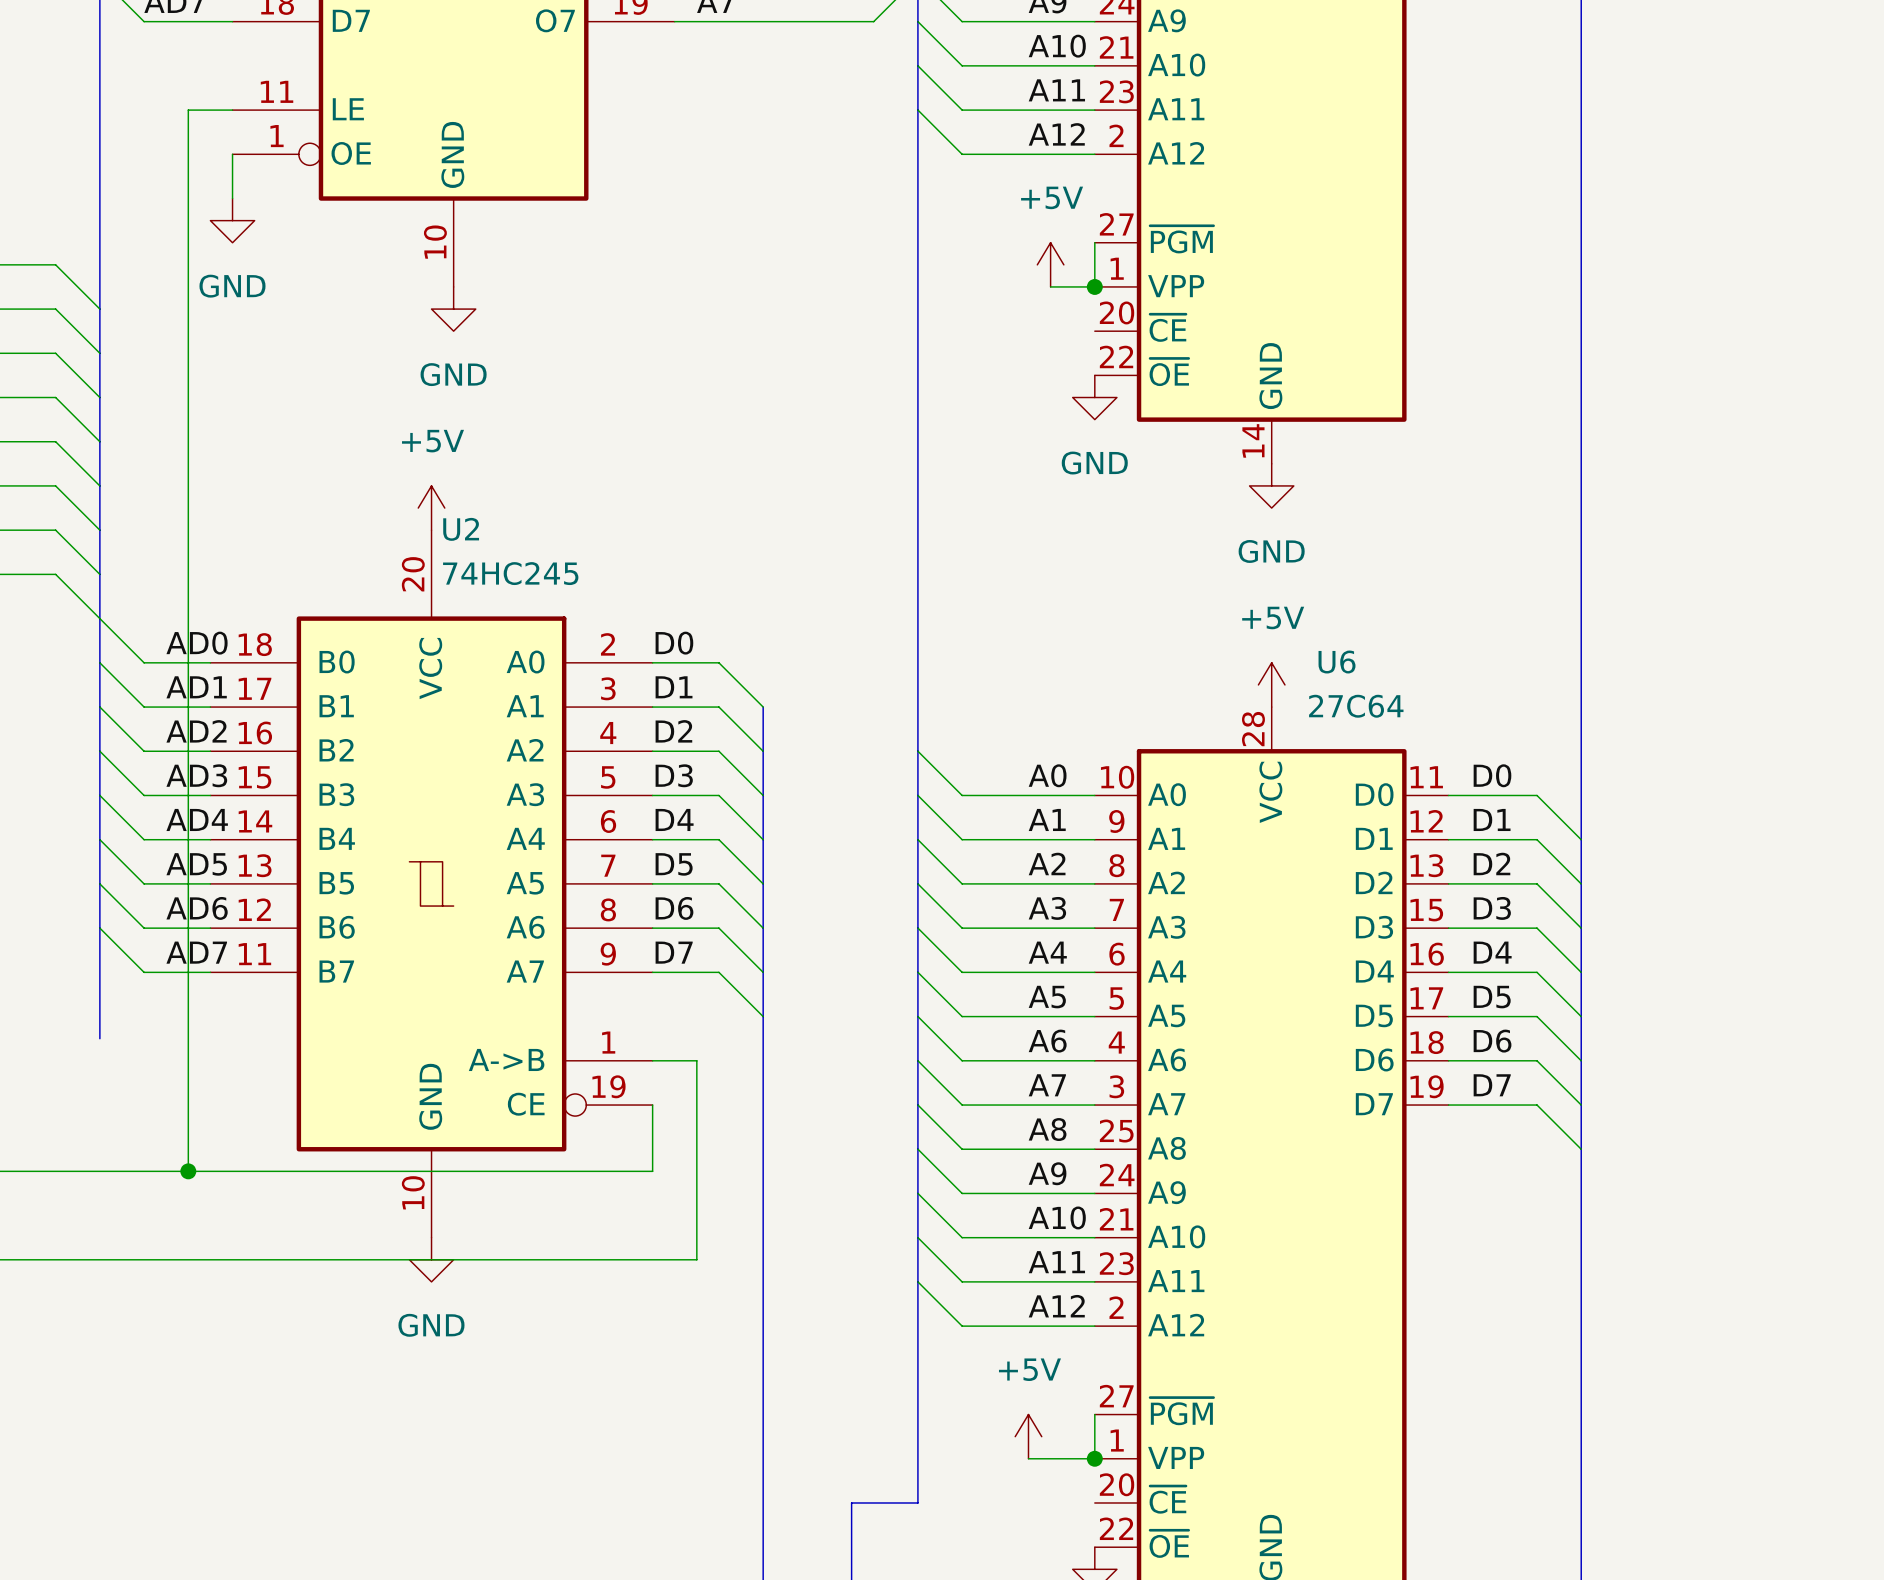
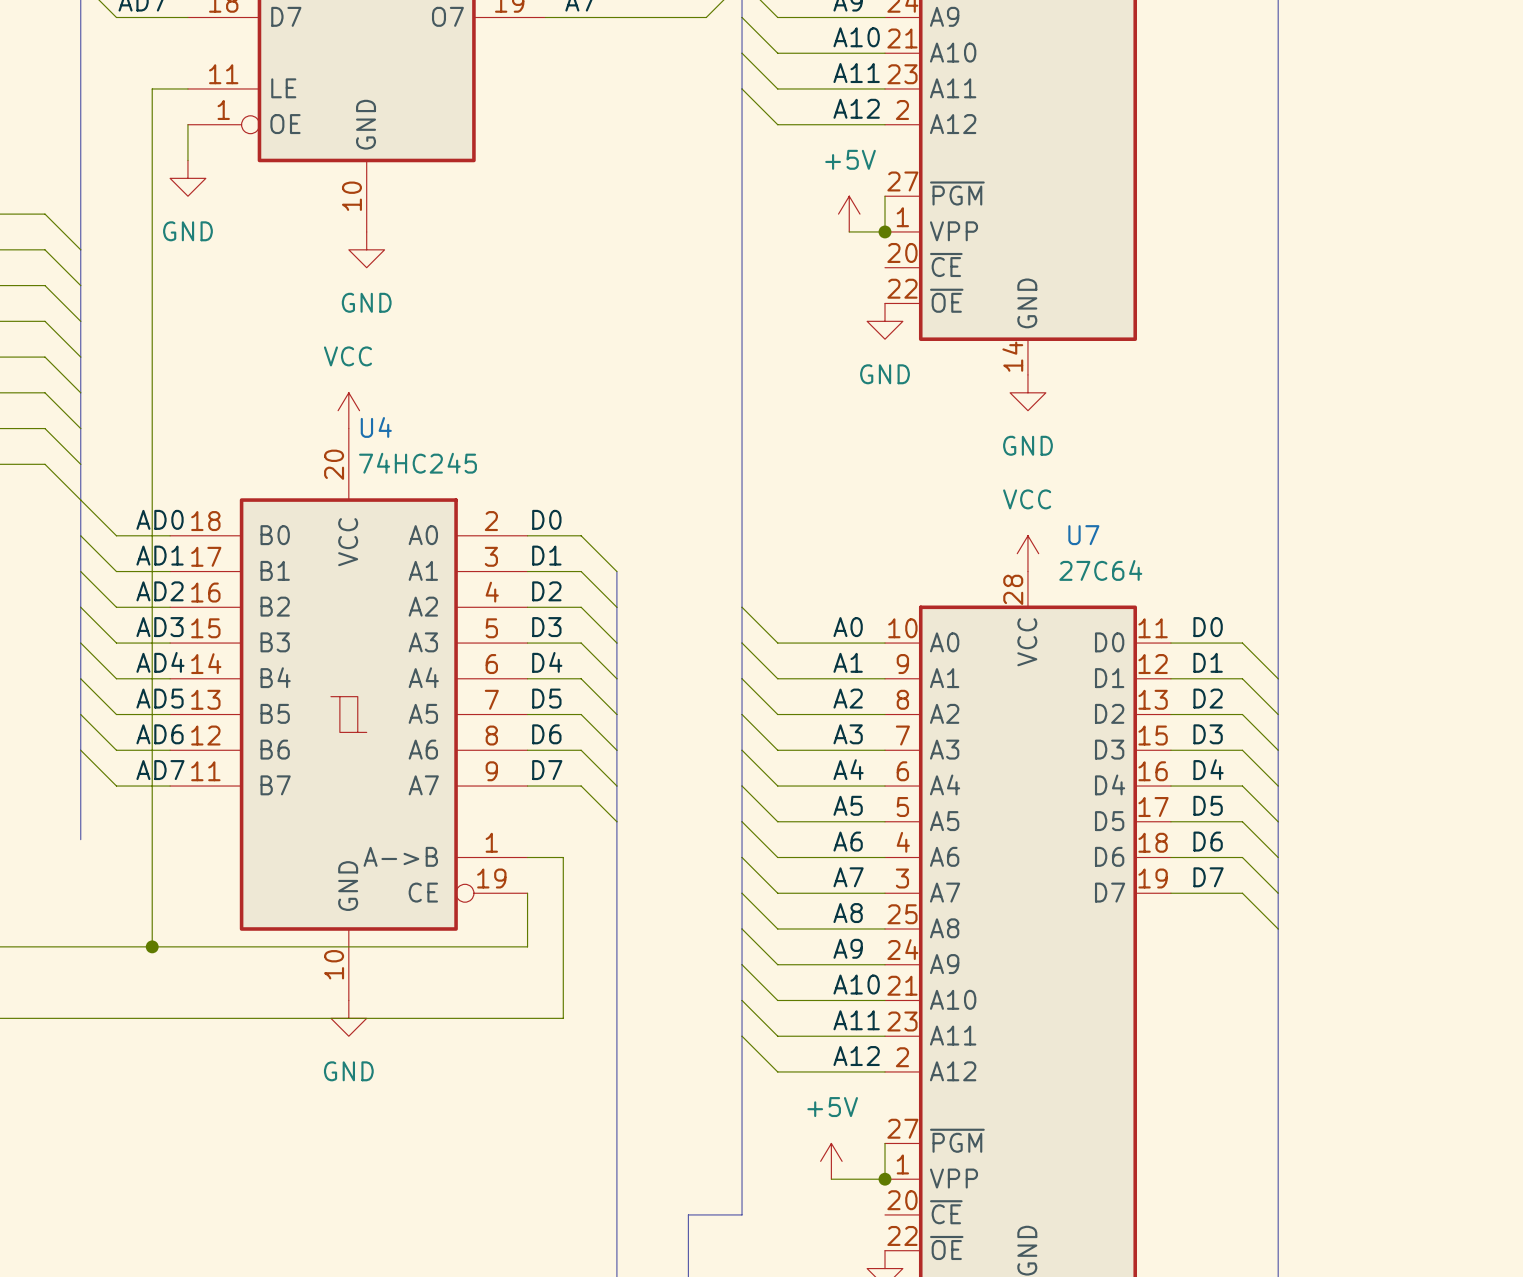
power symbol: +5V (431, 508) -> VCC (348, 410)
U2 name: U2 (461, 529) -> U4 (376, 427)
U6 name: U6 (1337, 662) -> U7 (1083, 535)
power symbol: +5V (1271, 684) -> VCC (1027, 553)

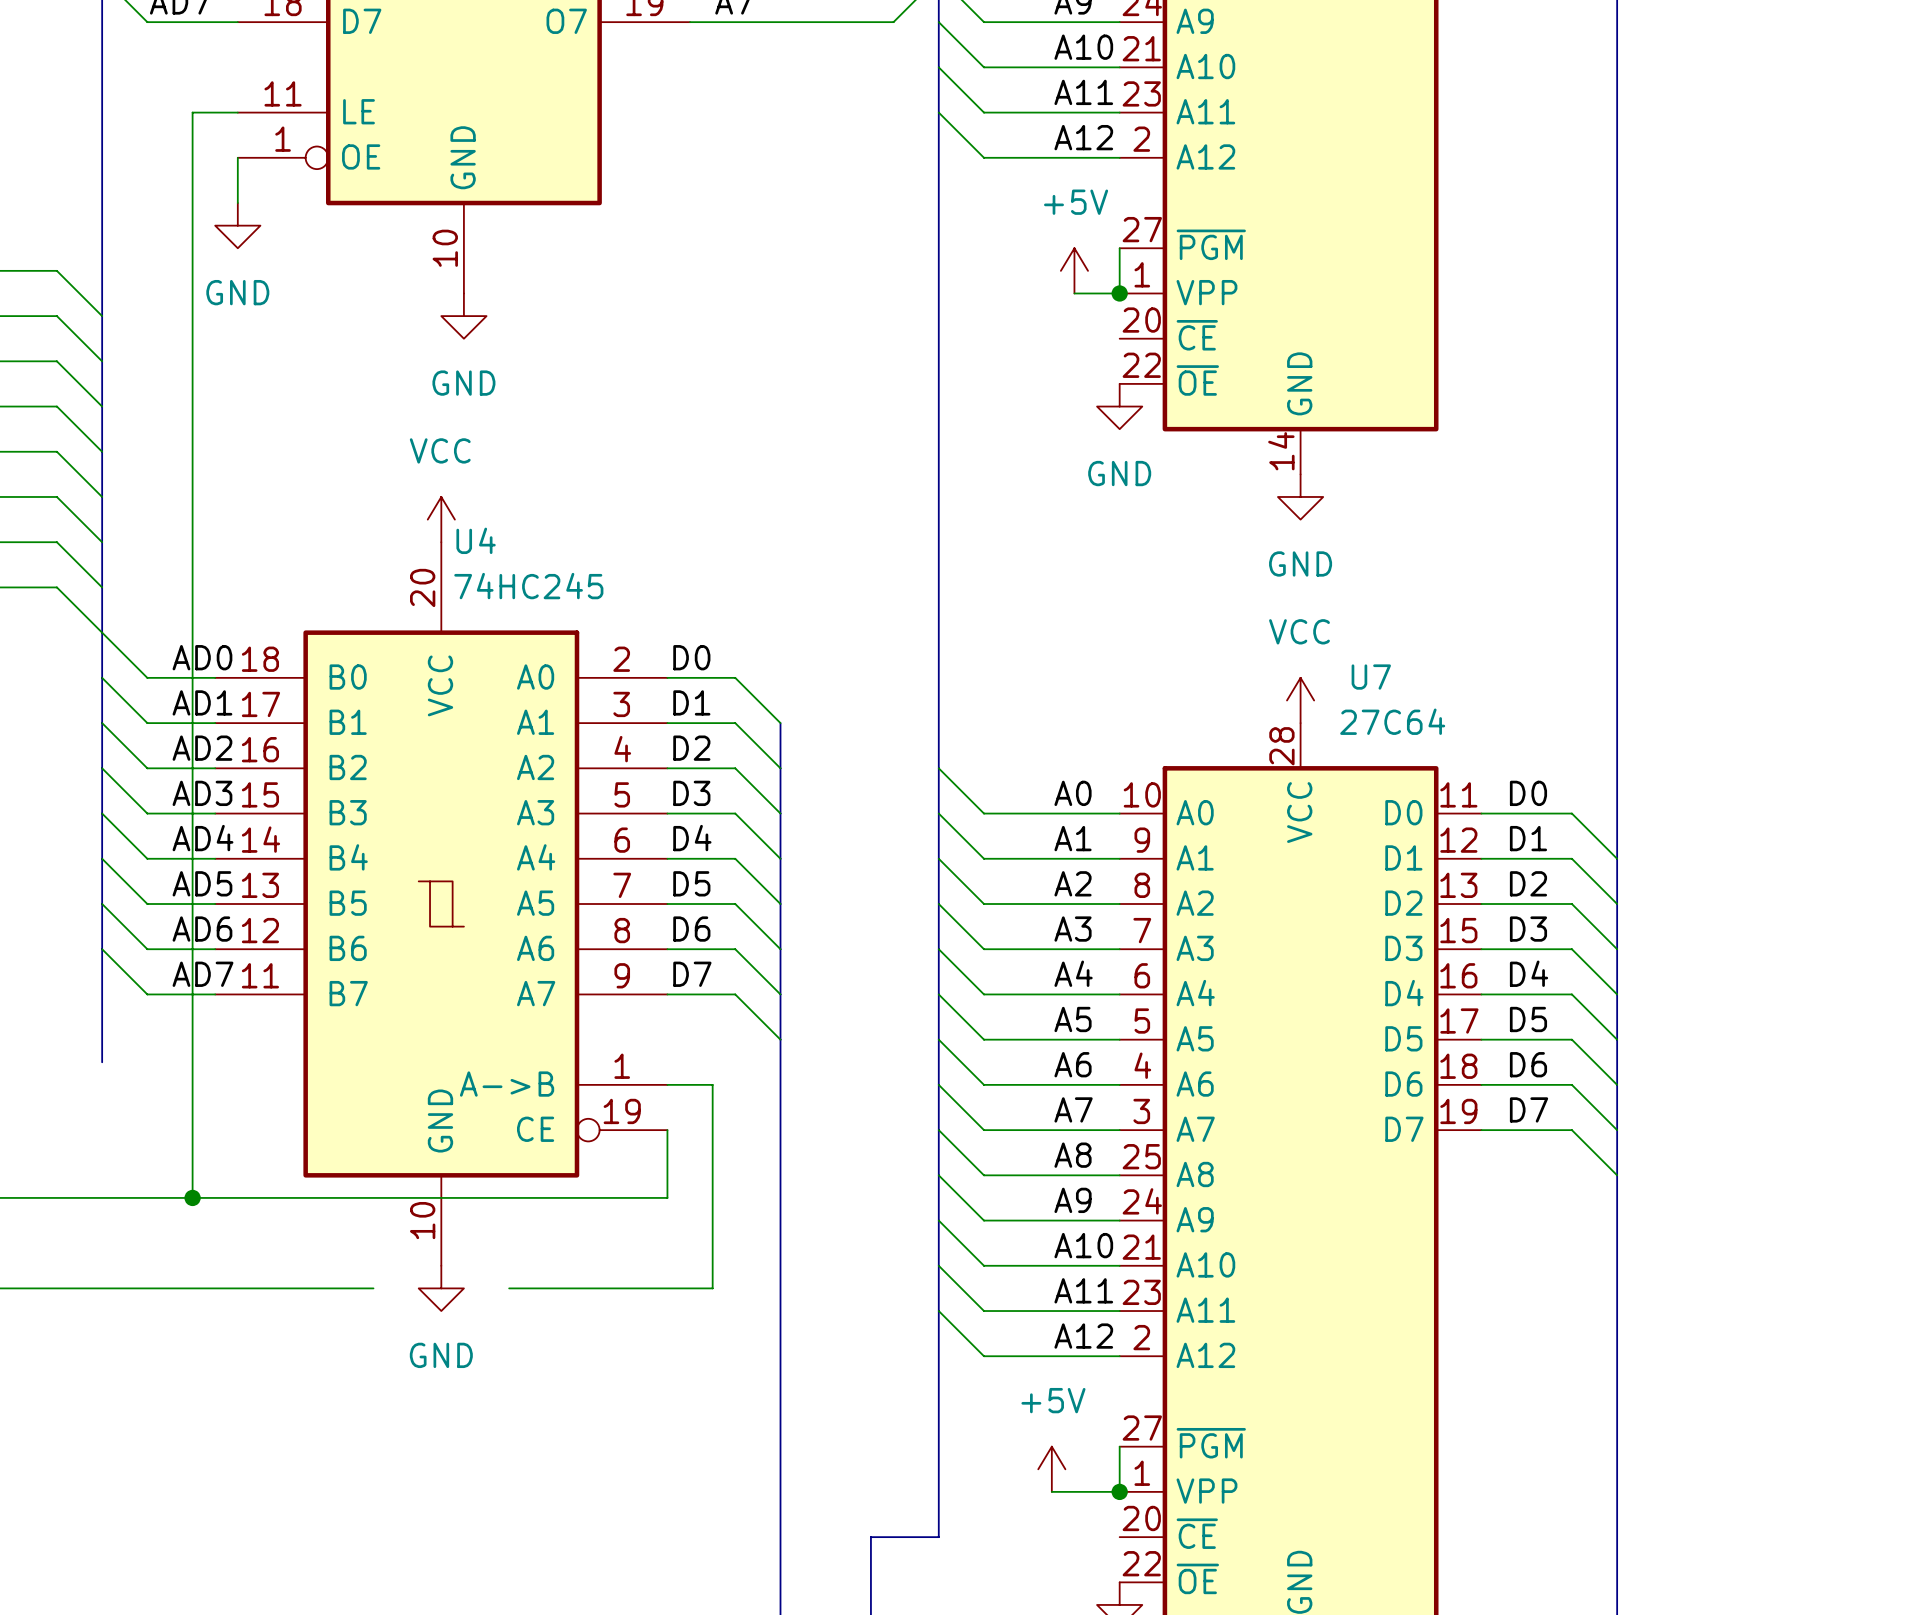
wire: (295, 1018) (402, 1018) -> none

